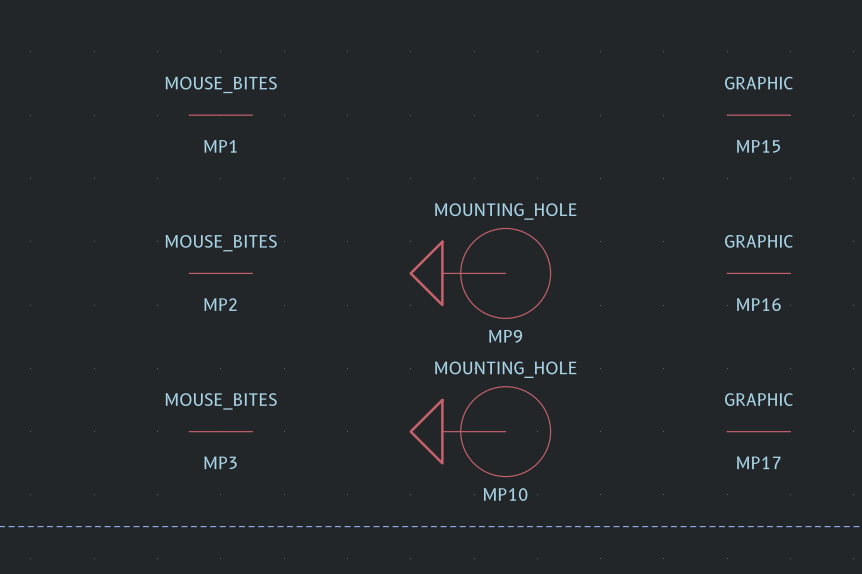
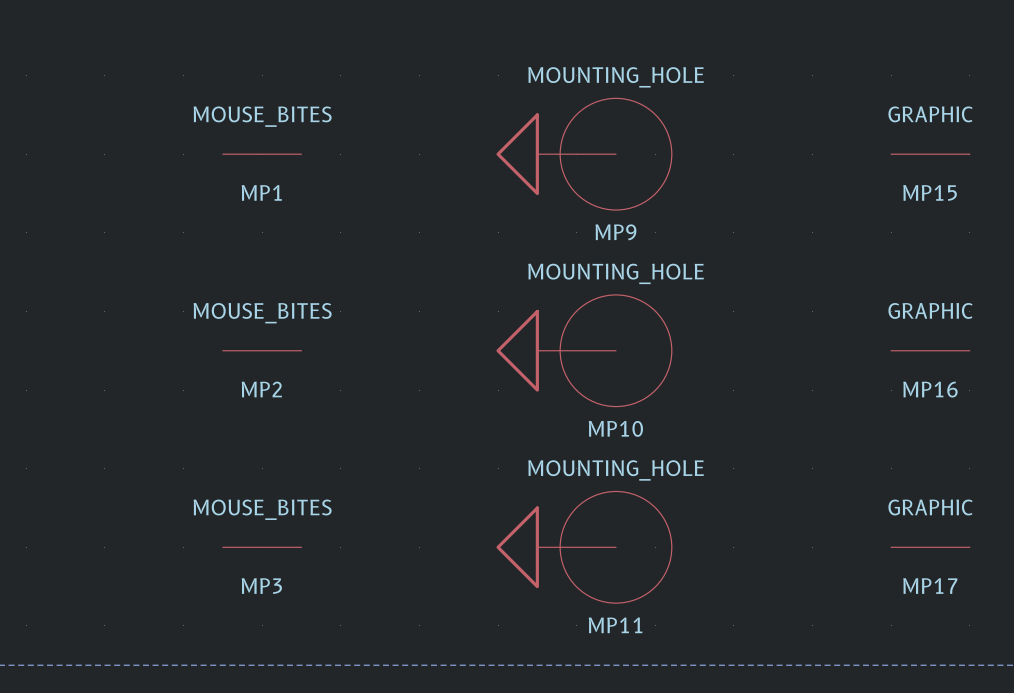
power symbol: none -> (517, 154)
MP9: none -> MOUNTING_HOLE (604, 154)
MP9 name: MP9 (505, 336) -> MP10 (615, 428)
MP10 name: MP10 (505, 494) -> MP11 (615, 625)

